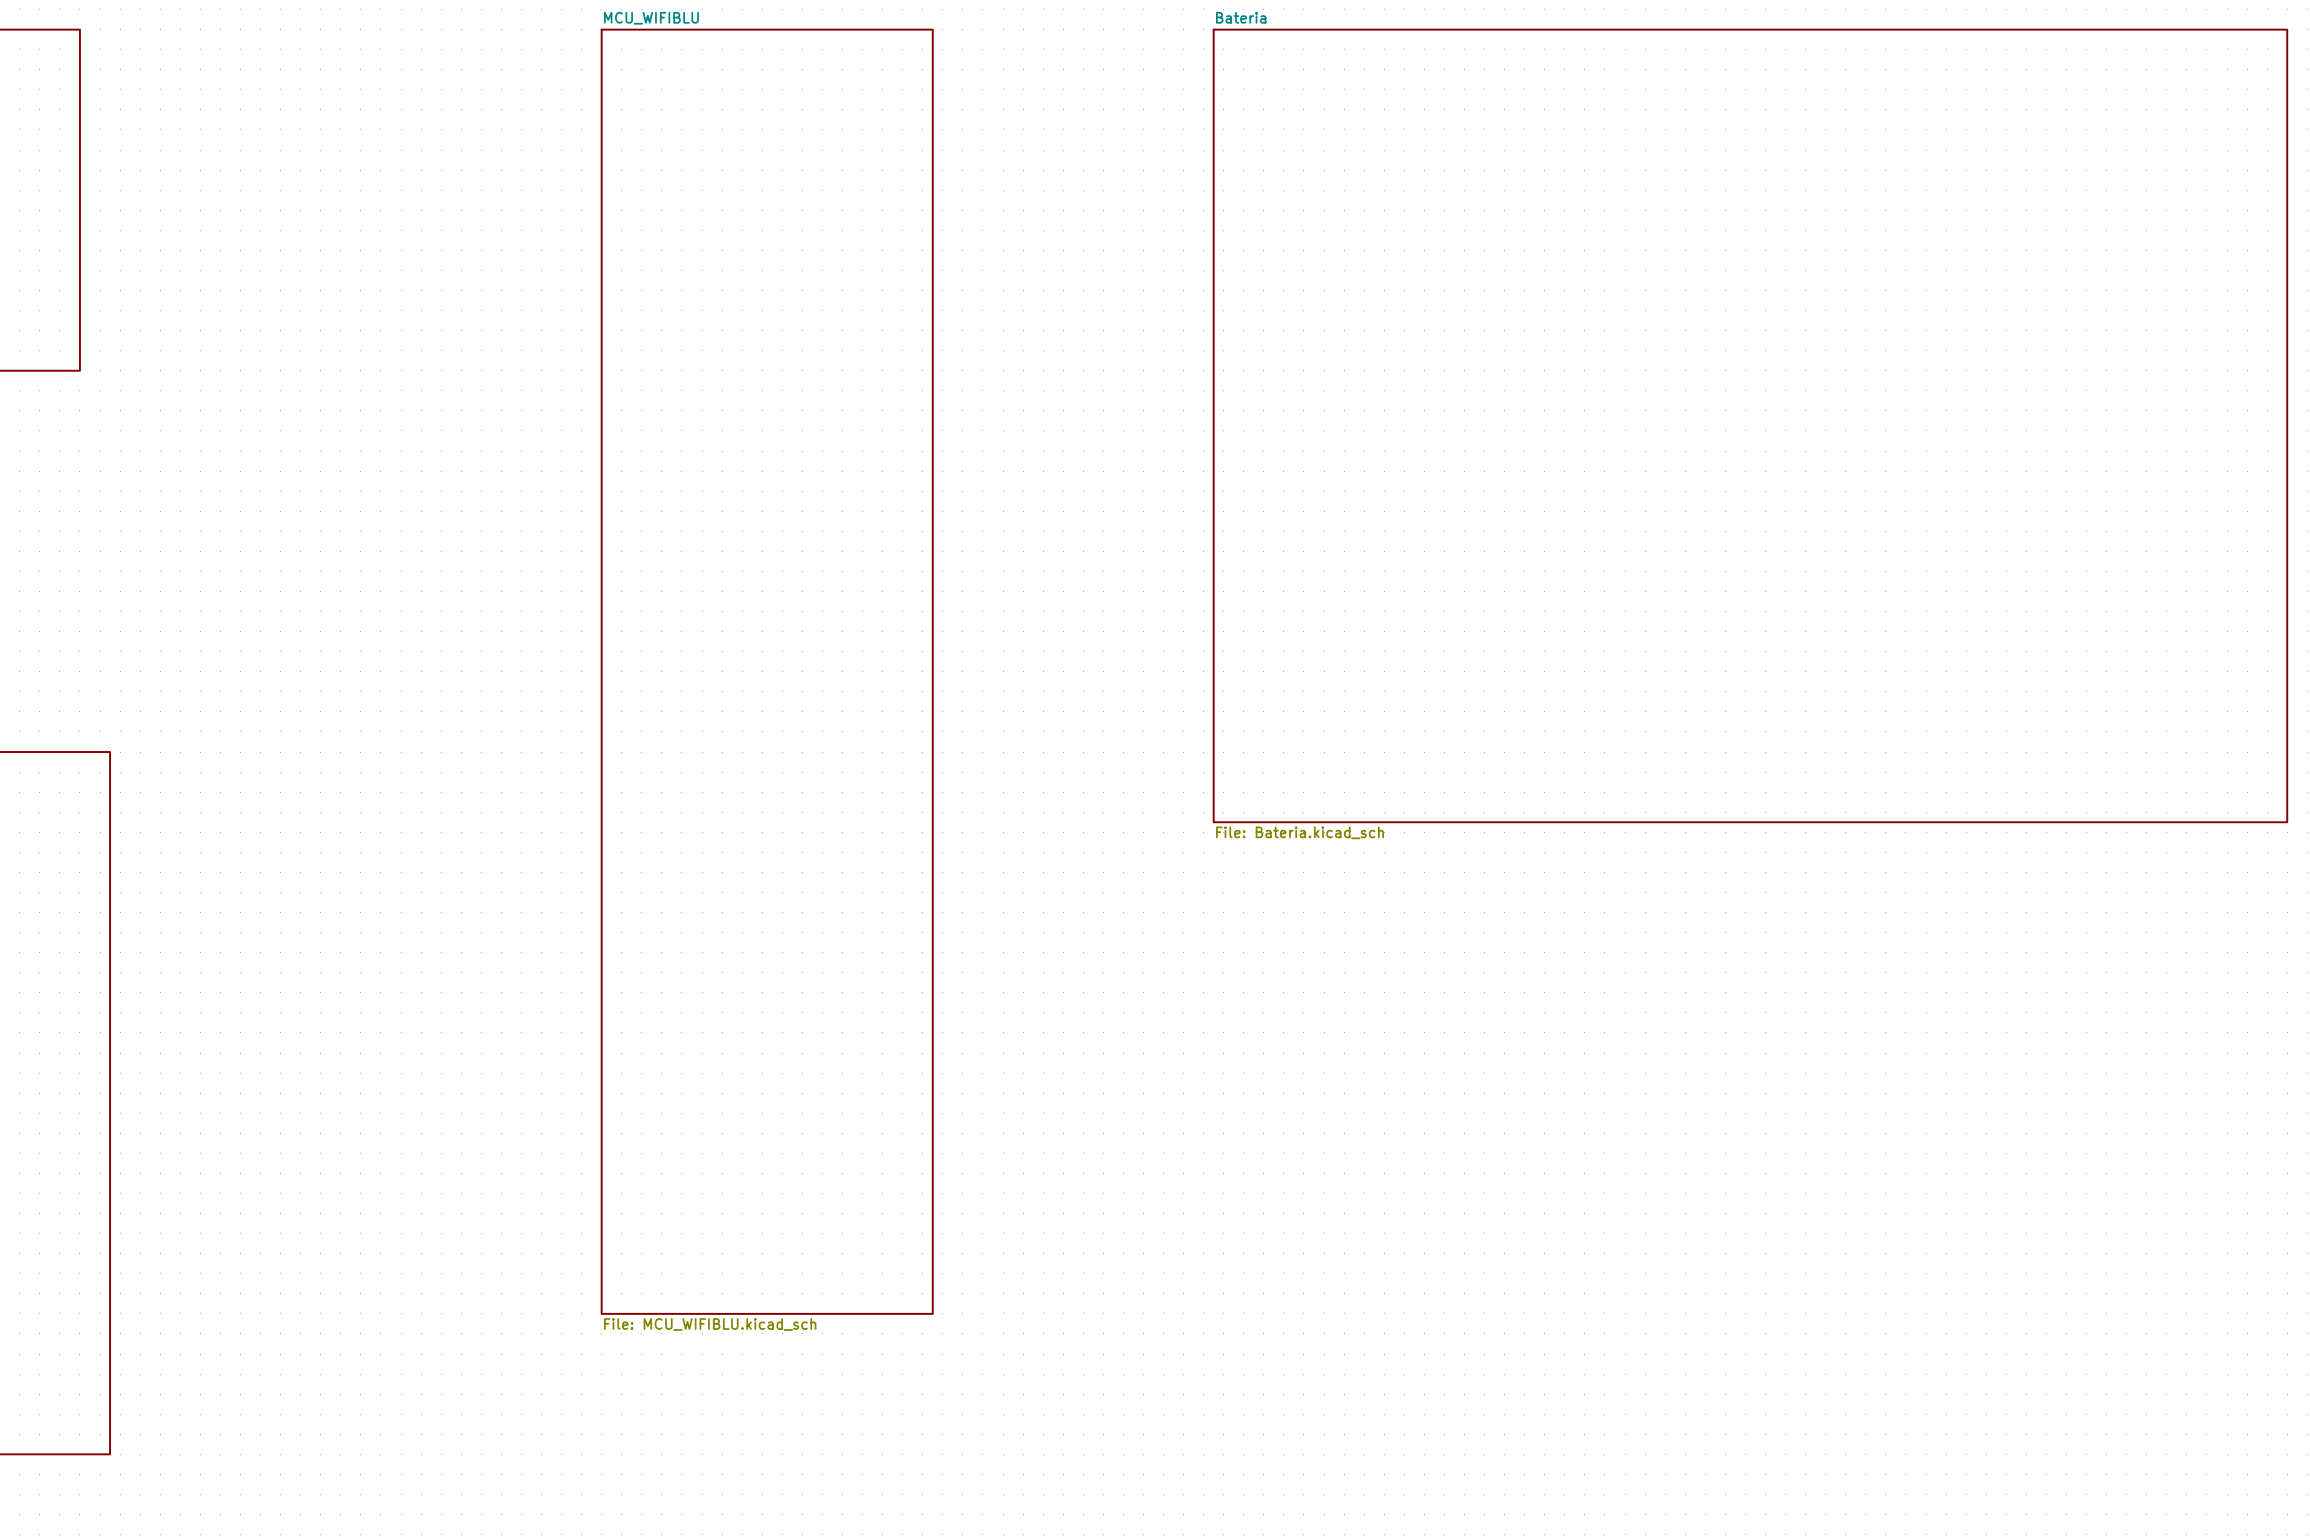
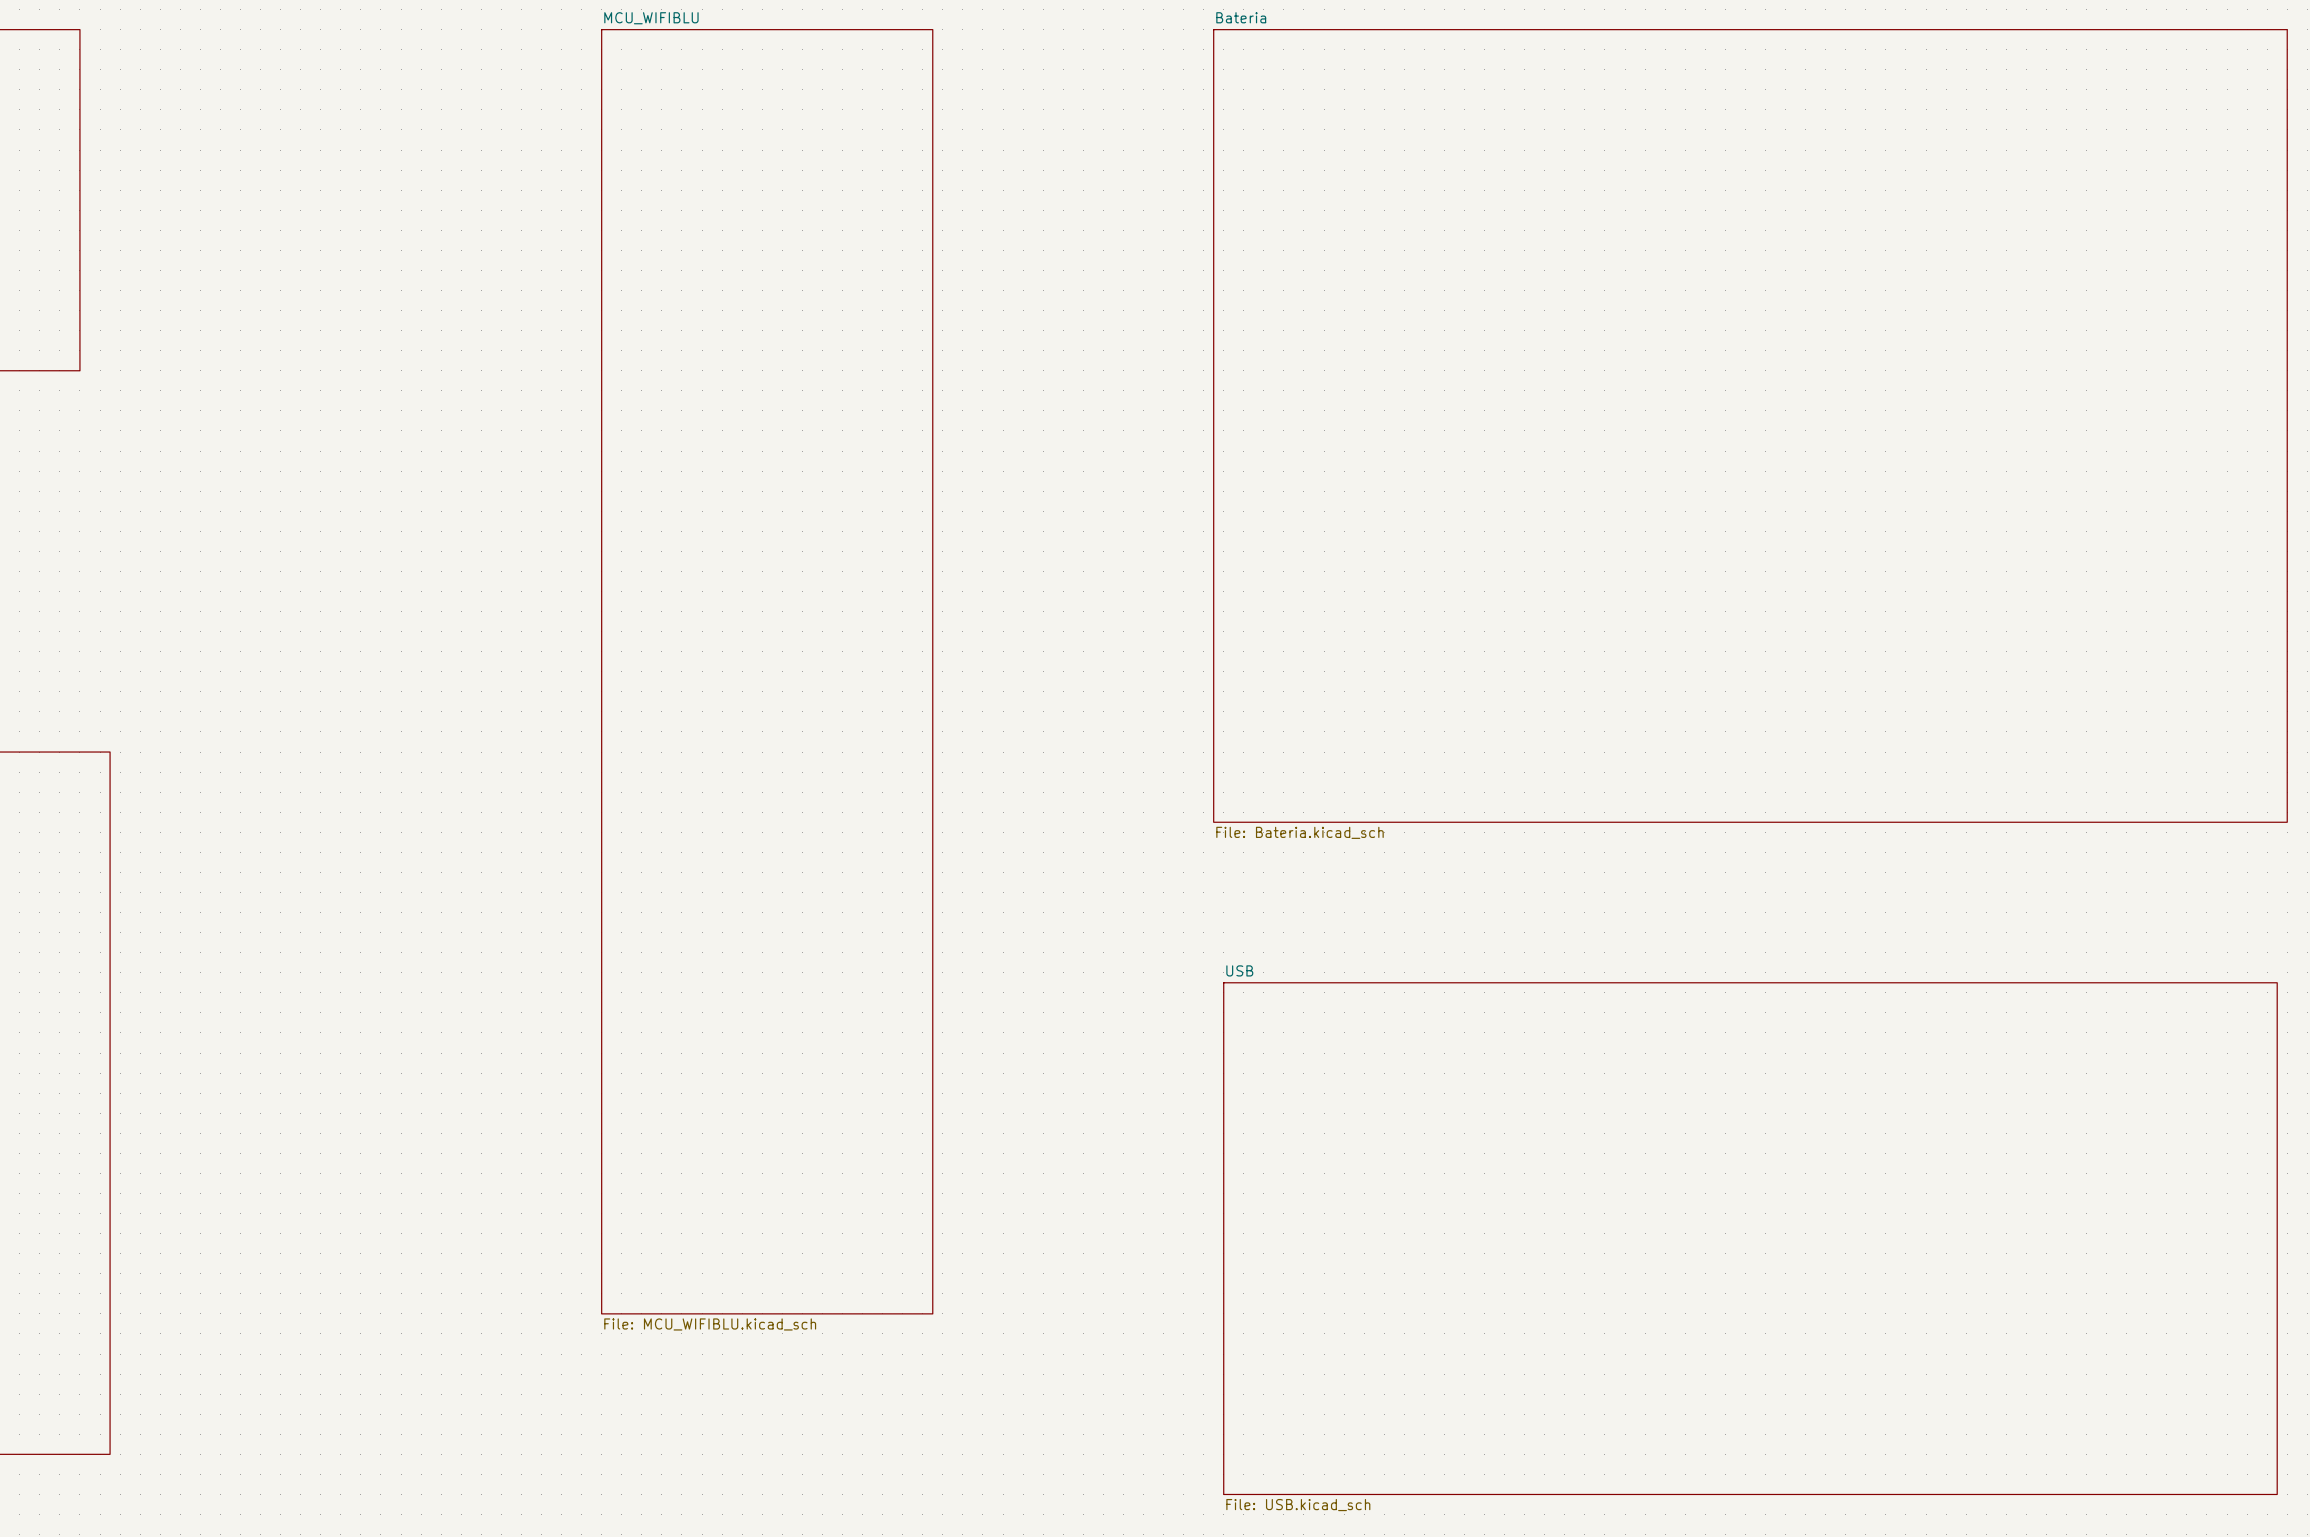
sheet USB: none -> File: USB.kicad_sch (1750, 1238)

